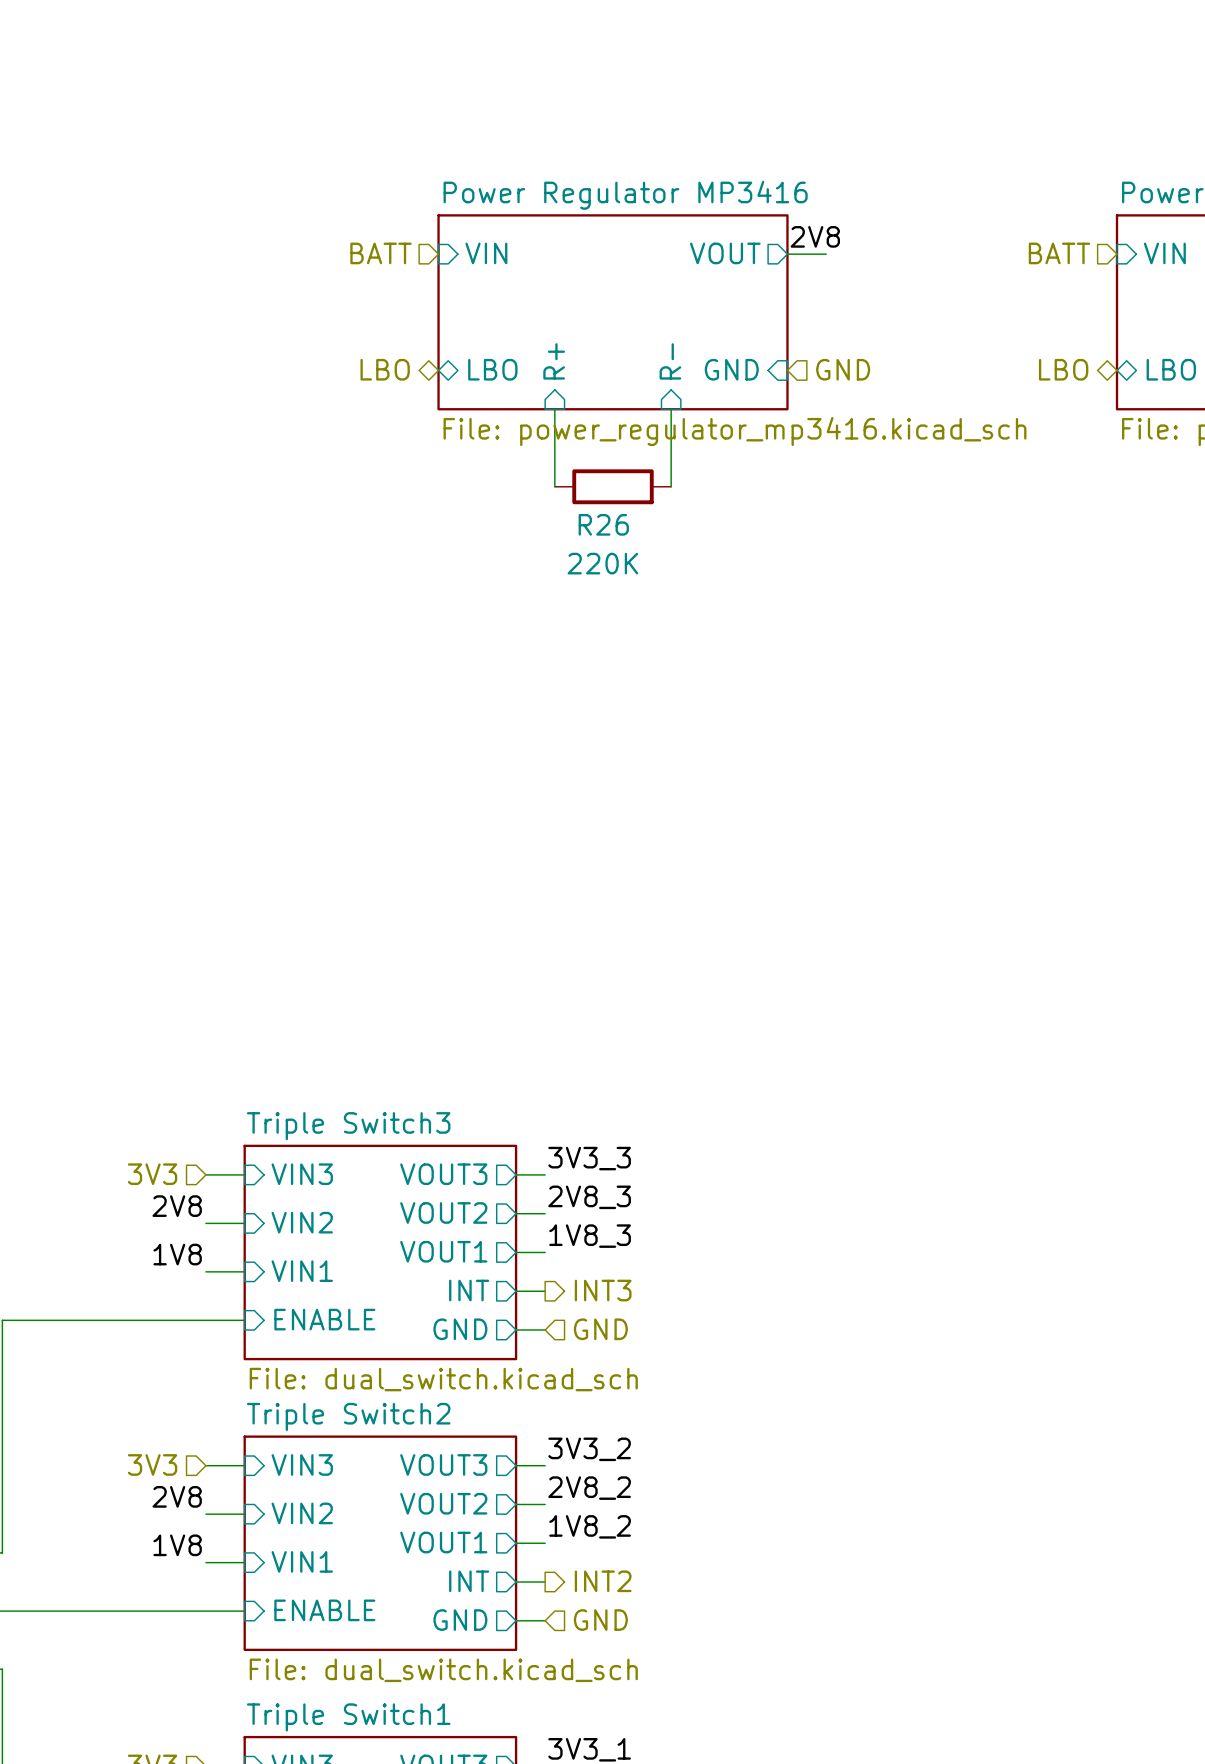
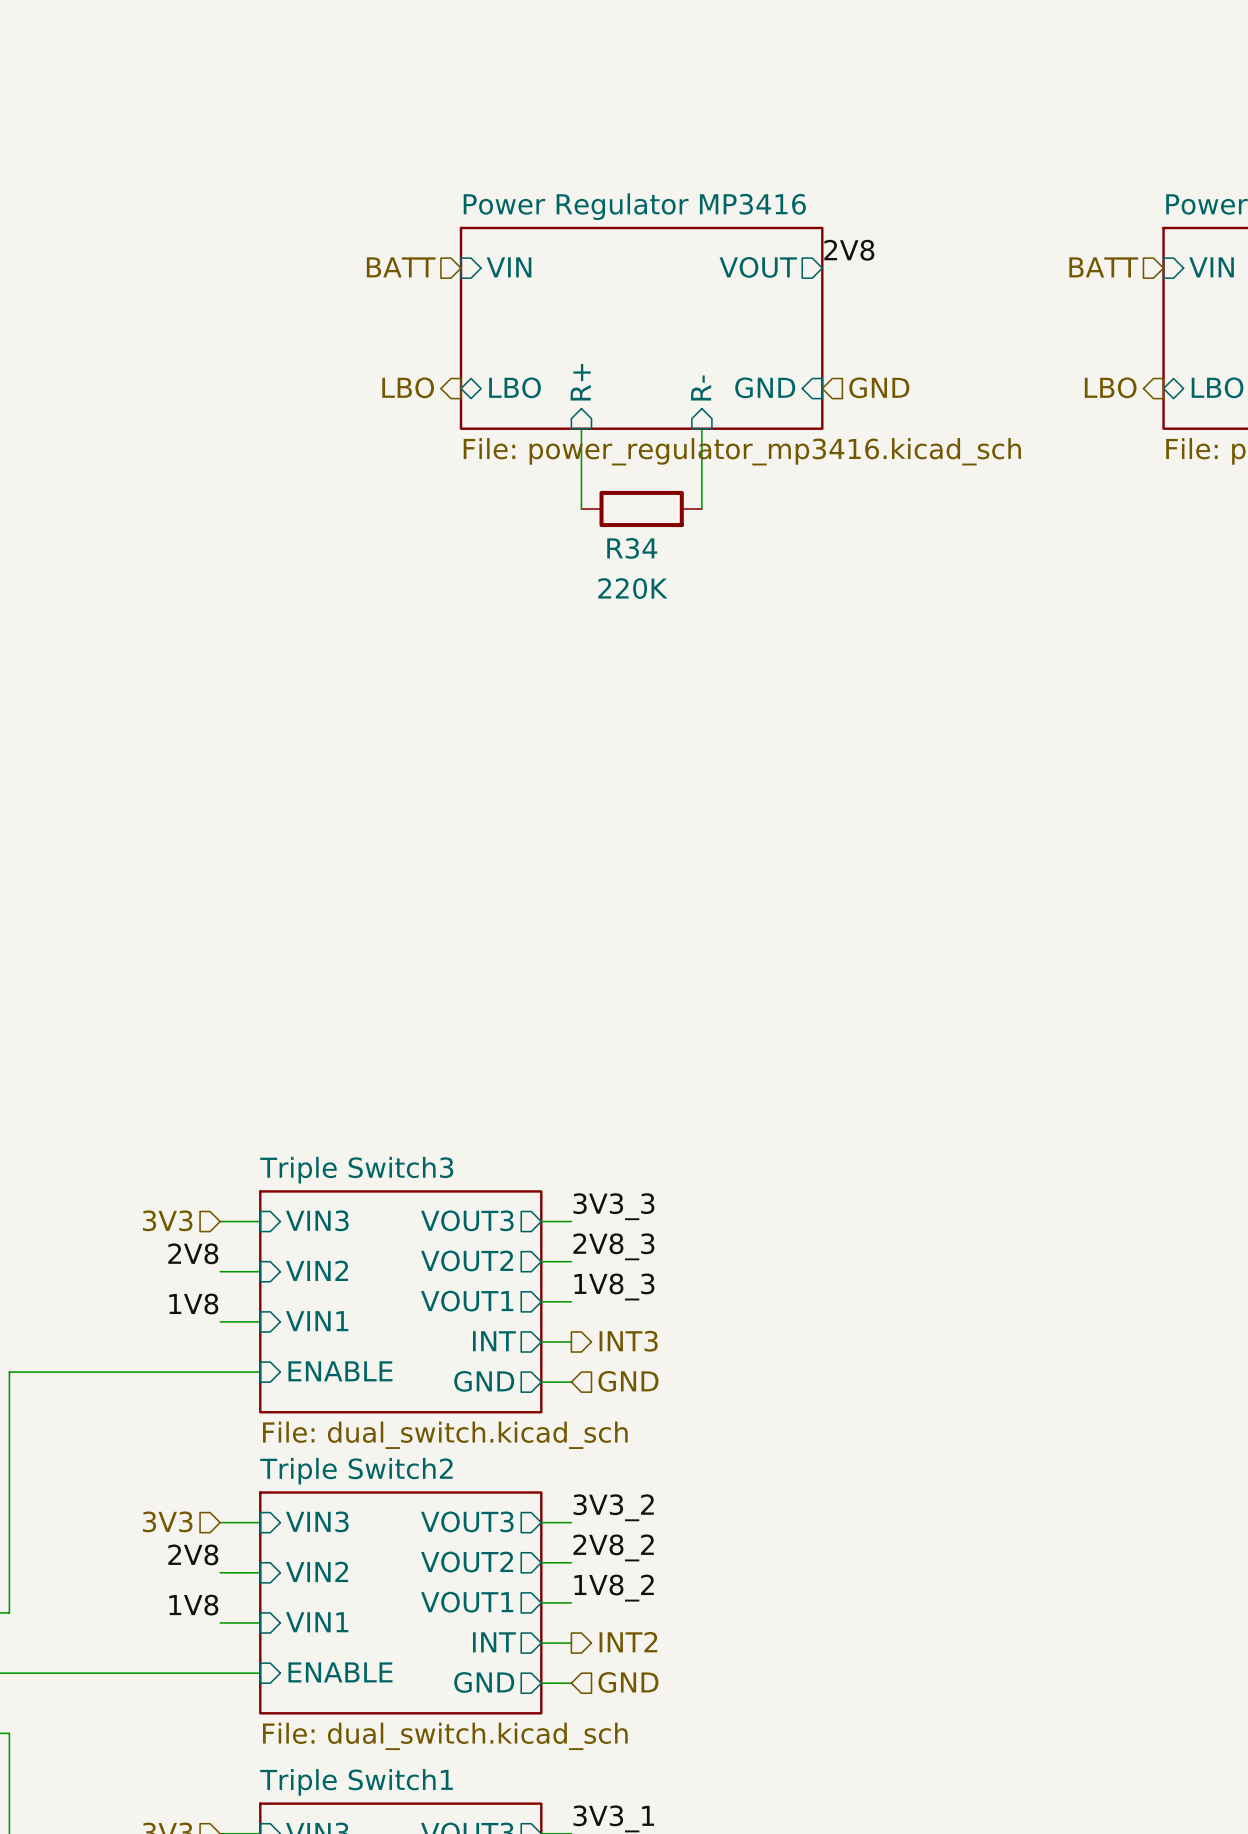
wire: (787, 254) (826, 254) -> none
hierarchical label shape: bidirectional (385, 369) -> output (408, 387)
hierarchical label shape: bidirectional (1063, 369) -> output (1110, 387)
R26 name: R26 (603, 524) -> R34 (632, 548)

